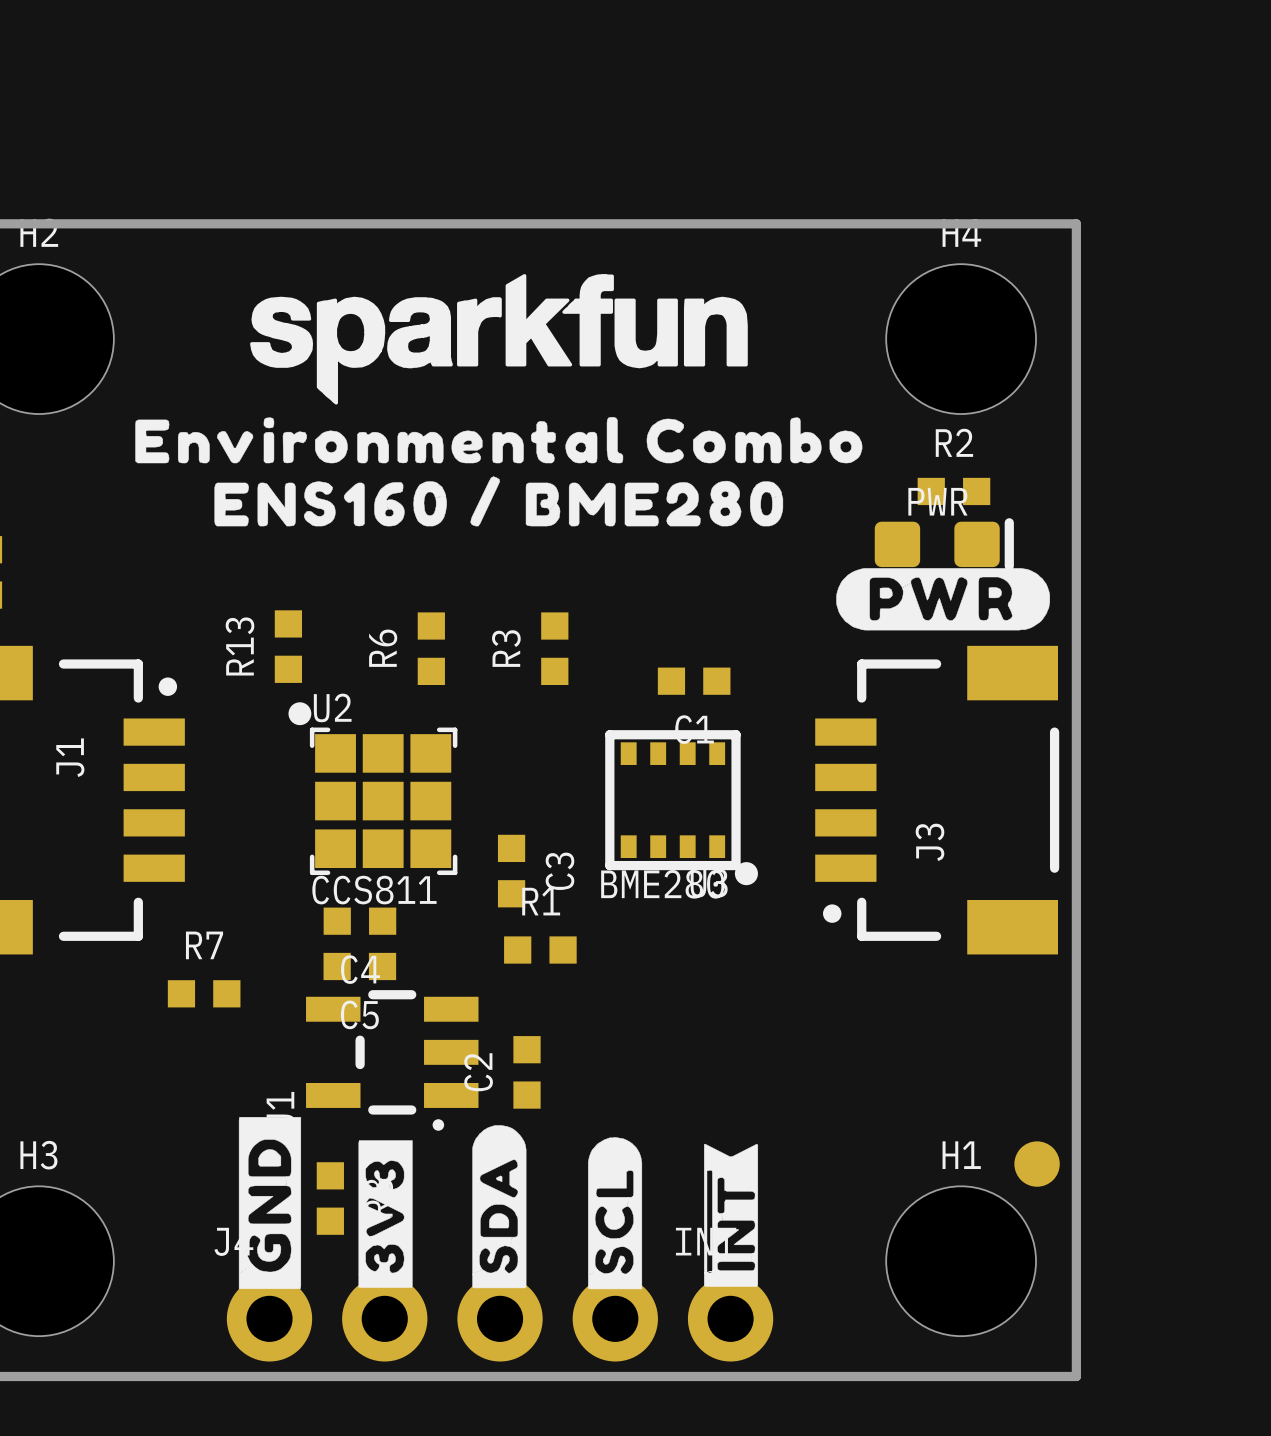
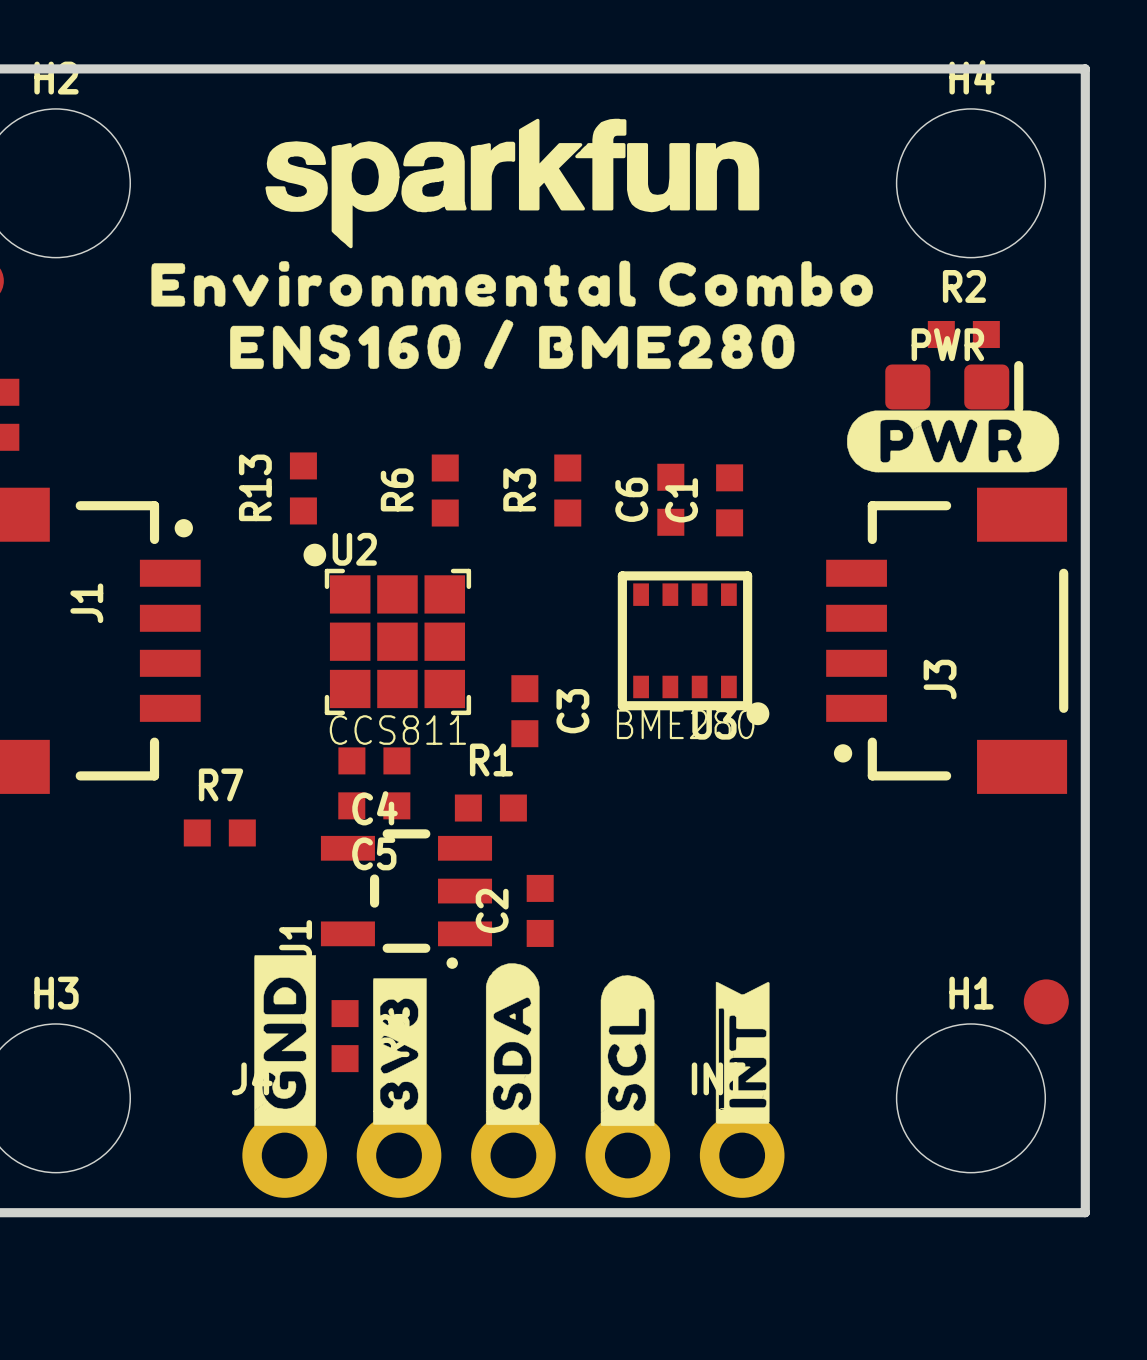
C6: none -> (670, 499)
C1 rotation: 0° (694, 681) -> 90° clockwise (729, 500)
R1 position: (540, 950) -> (490, 808)

